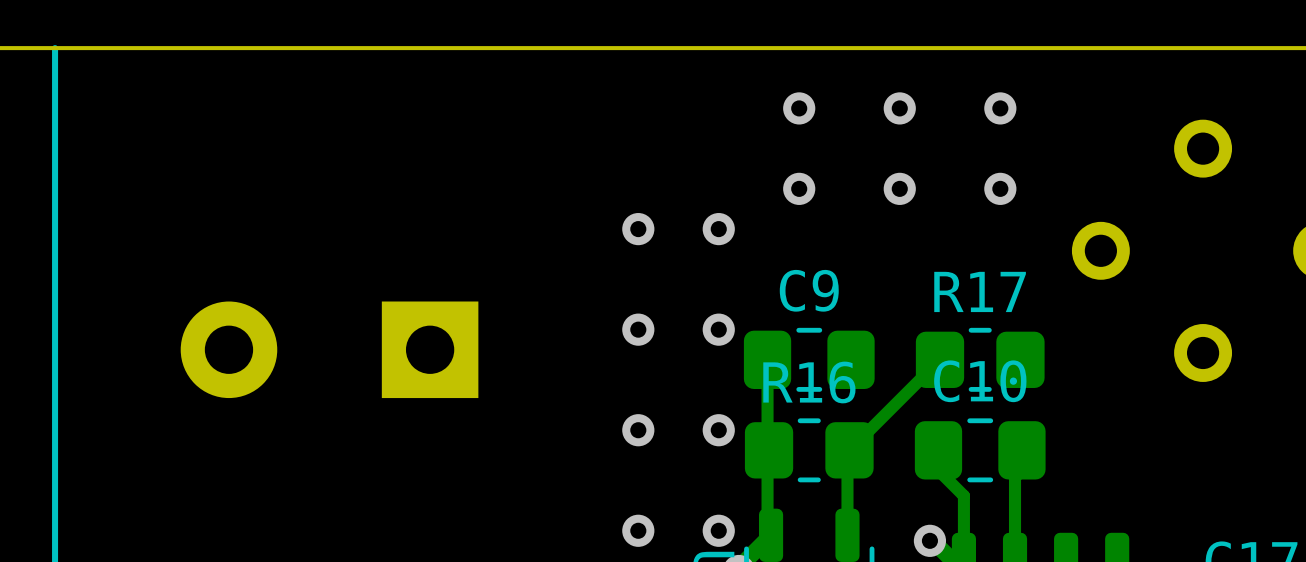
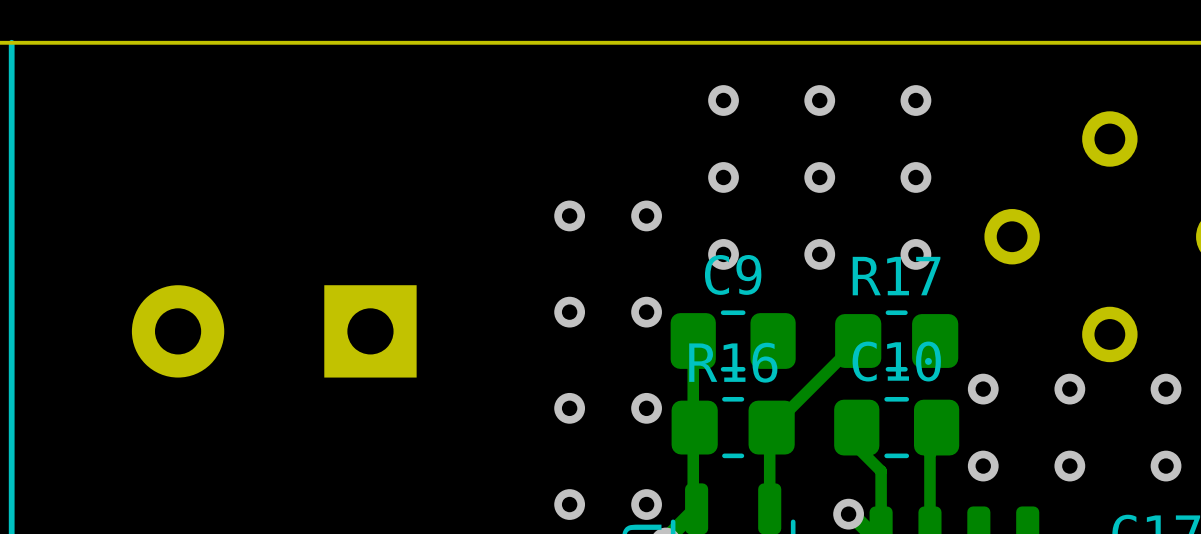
via: none -> (723, 254)
via: none -> (819, 254)
via: none -> (915, 254)
via: none -> (983, 389)
via: none -> (1069, 389)
via: none -> (1166, 389)
via: none -> (983, 466)
via: none -> (1069, 466)
via: none -> (1166, 466)

